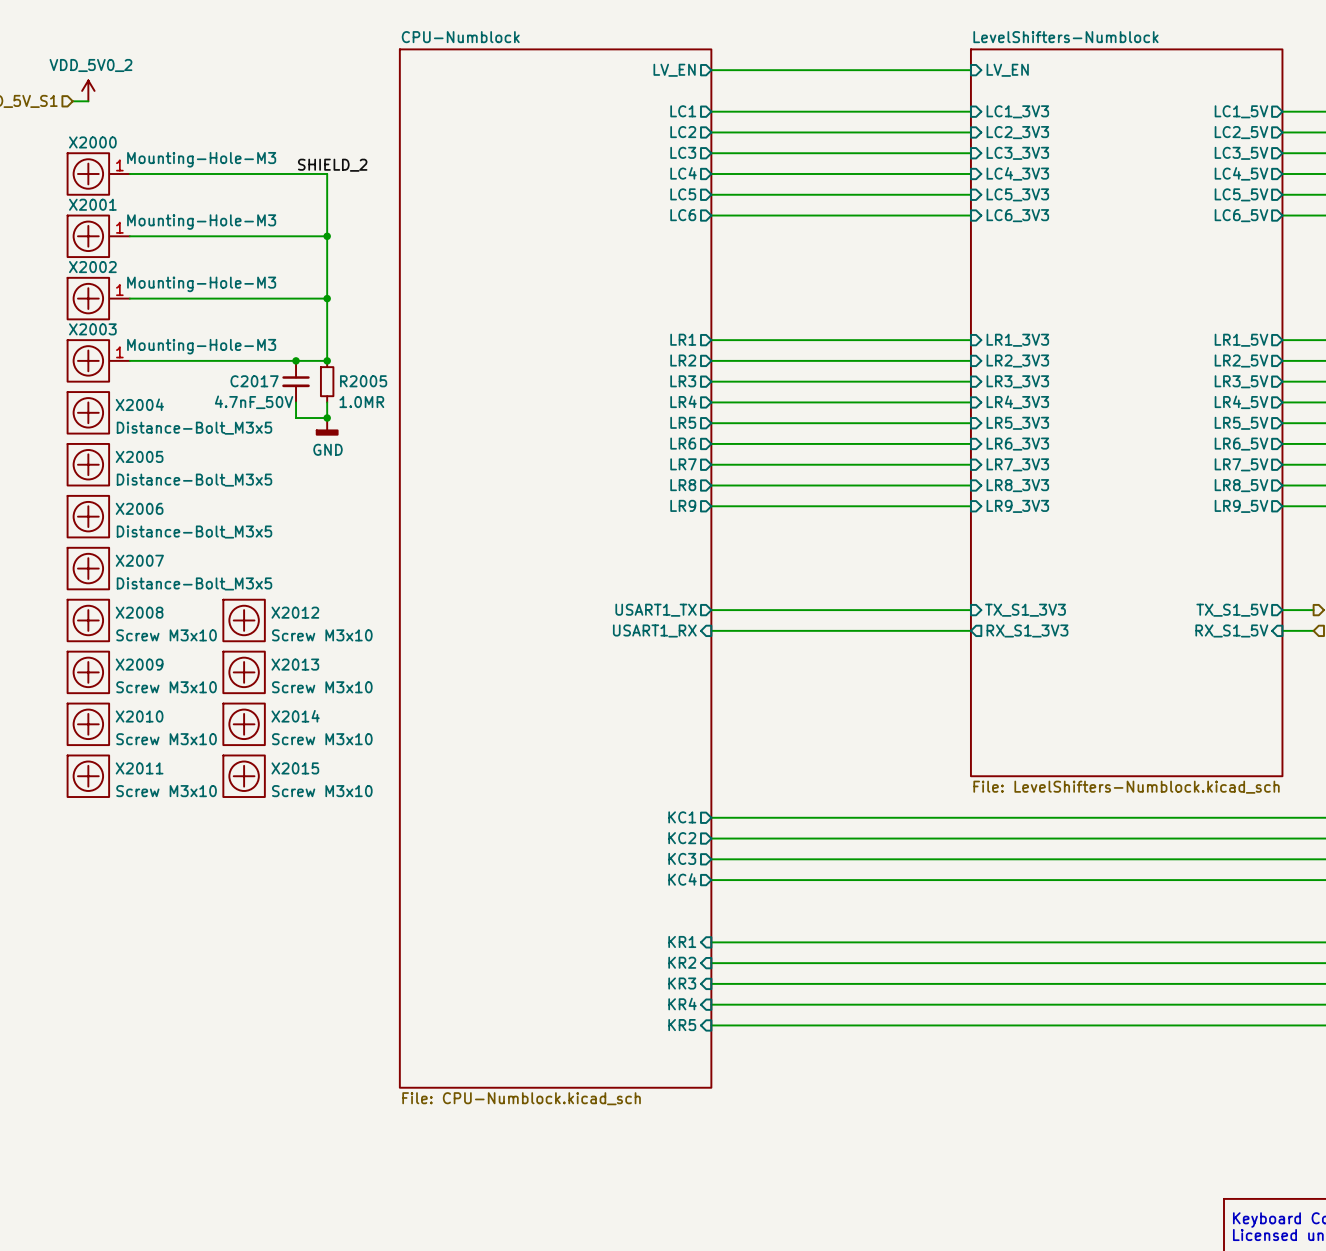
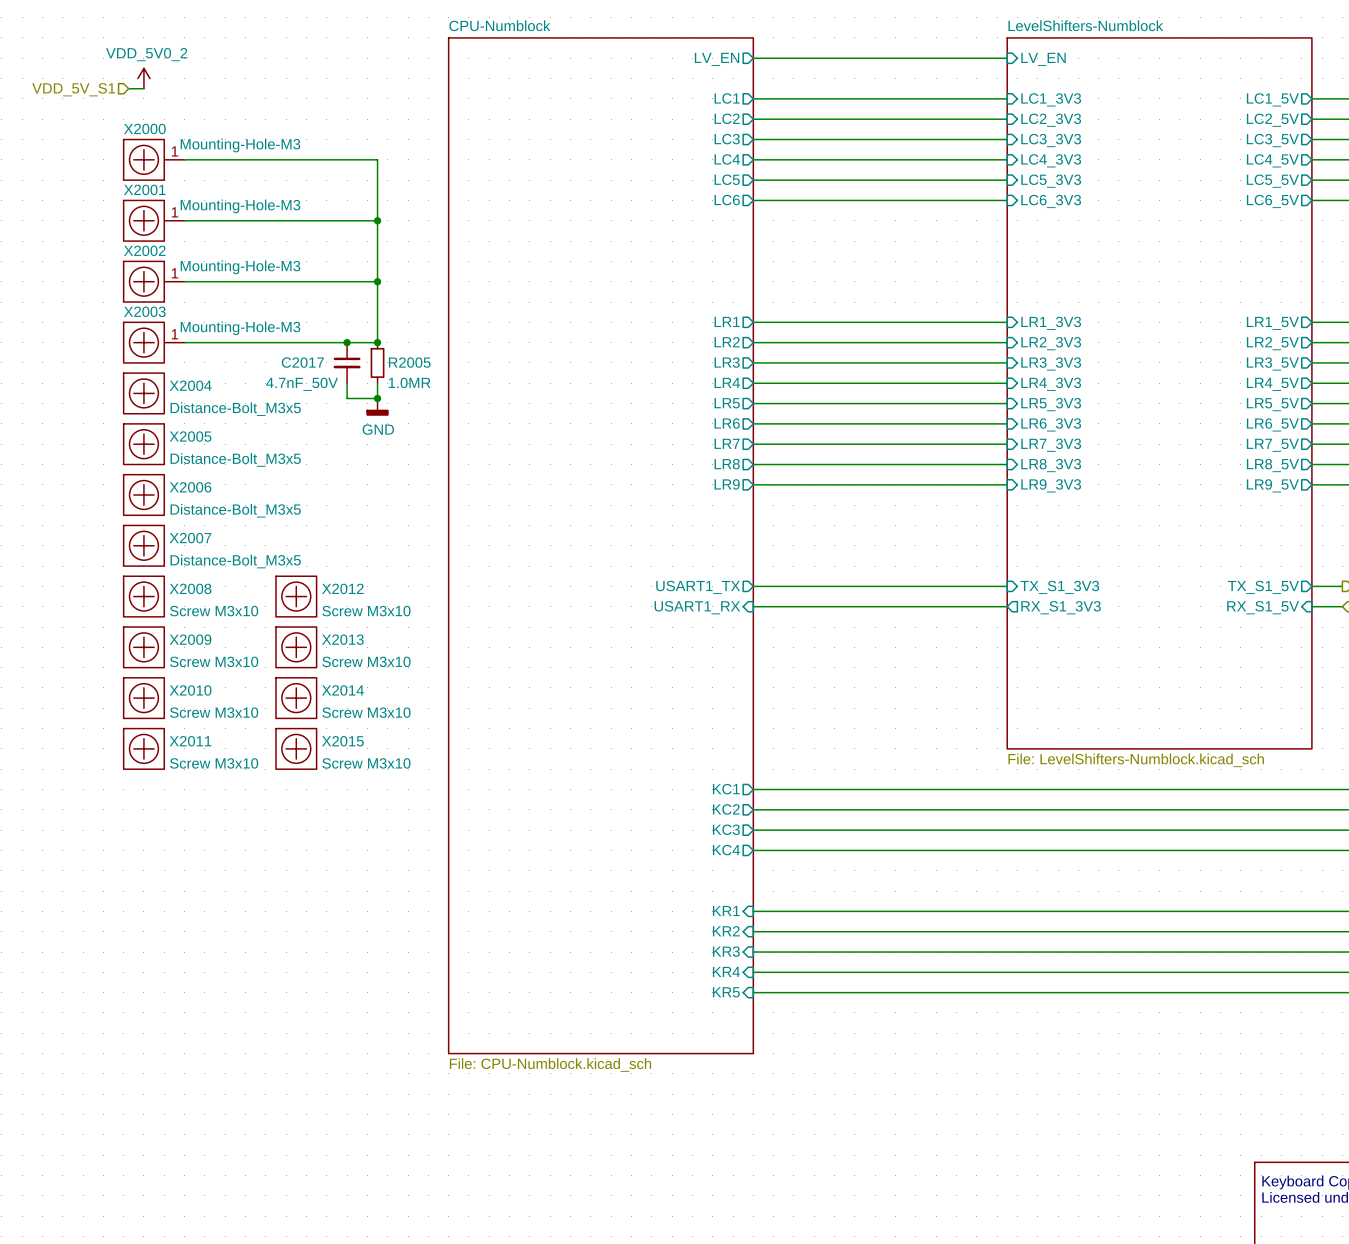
label: SHIELD_2 (332, 165) -> none

